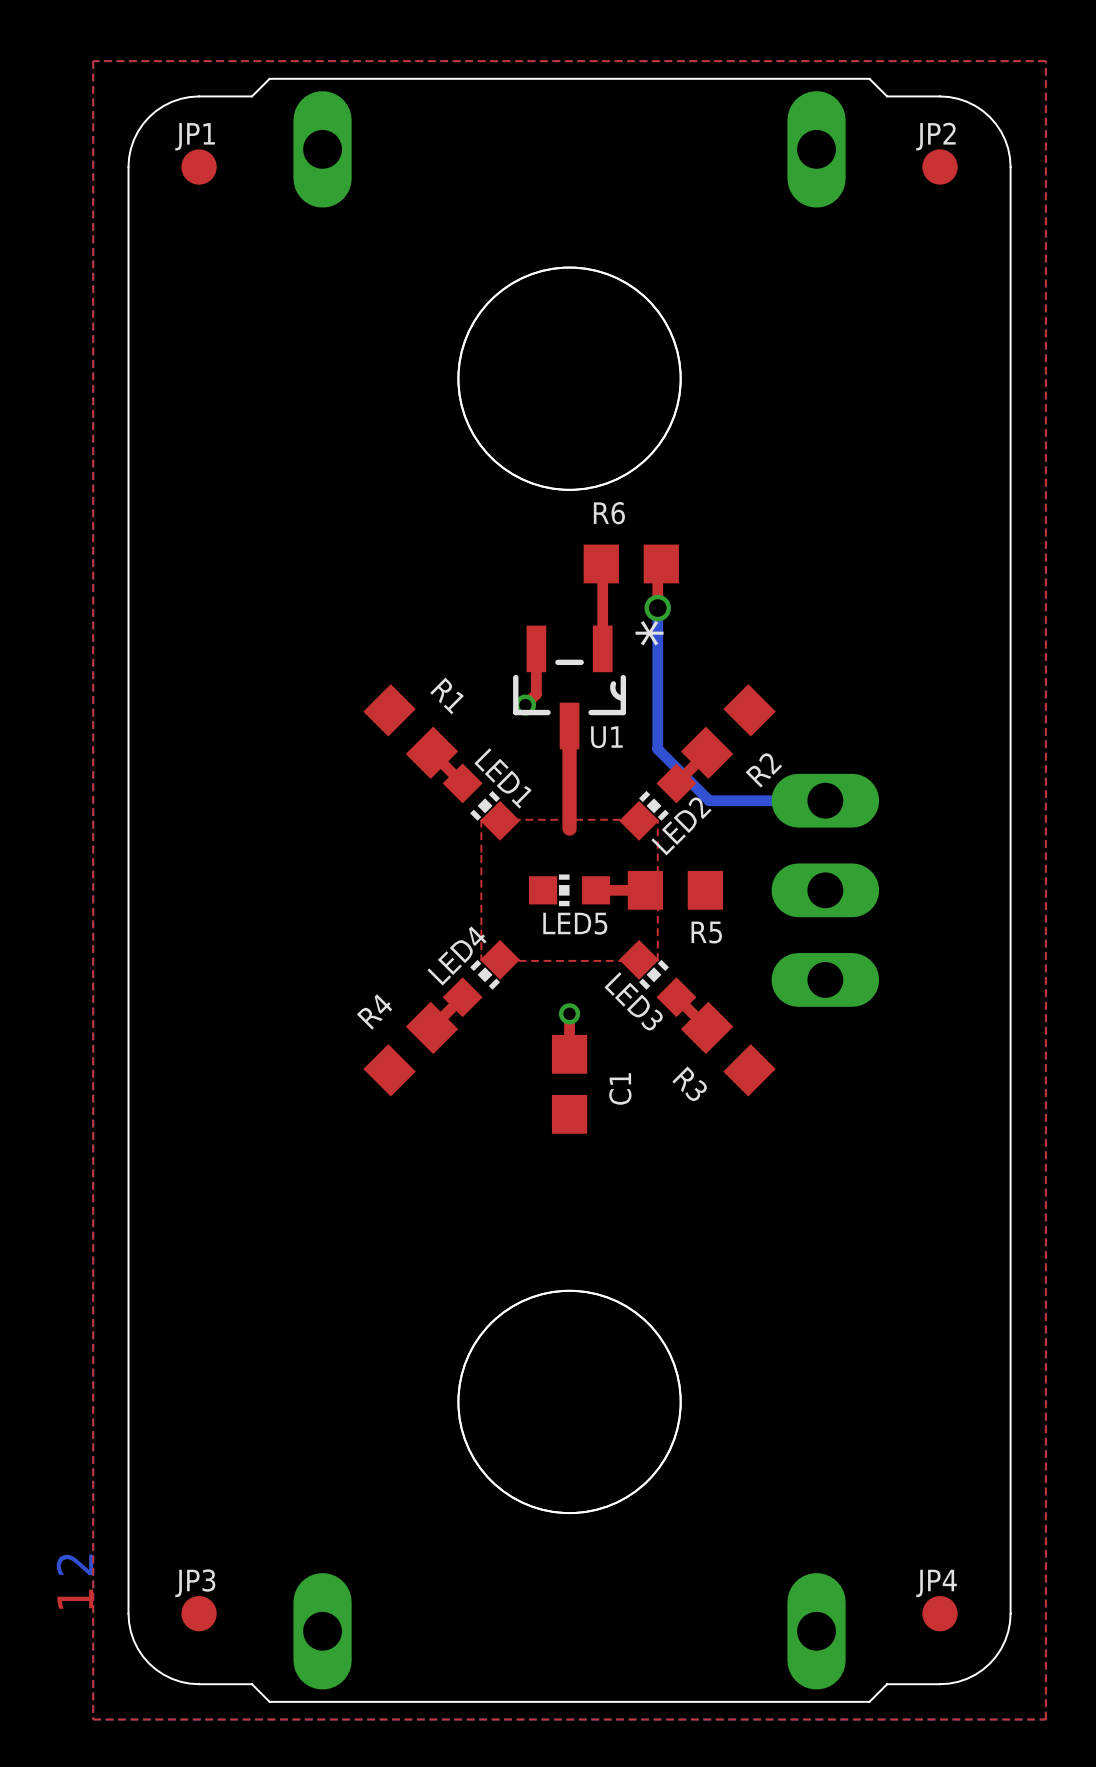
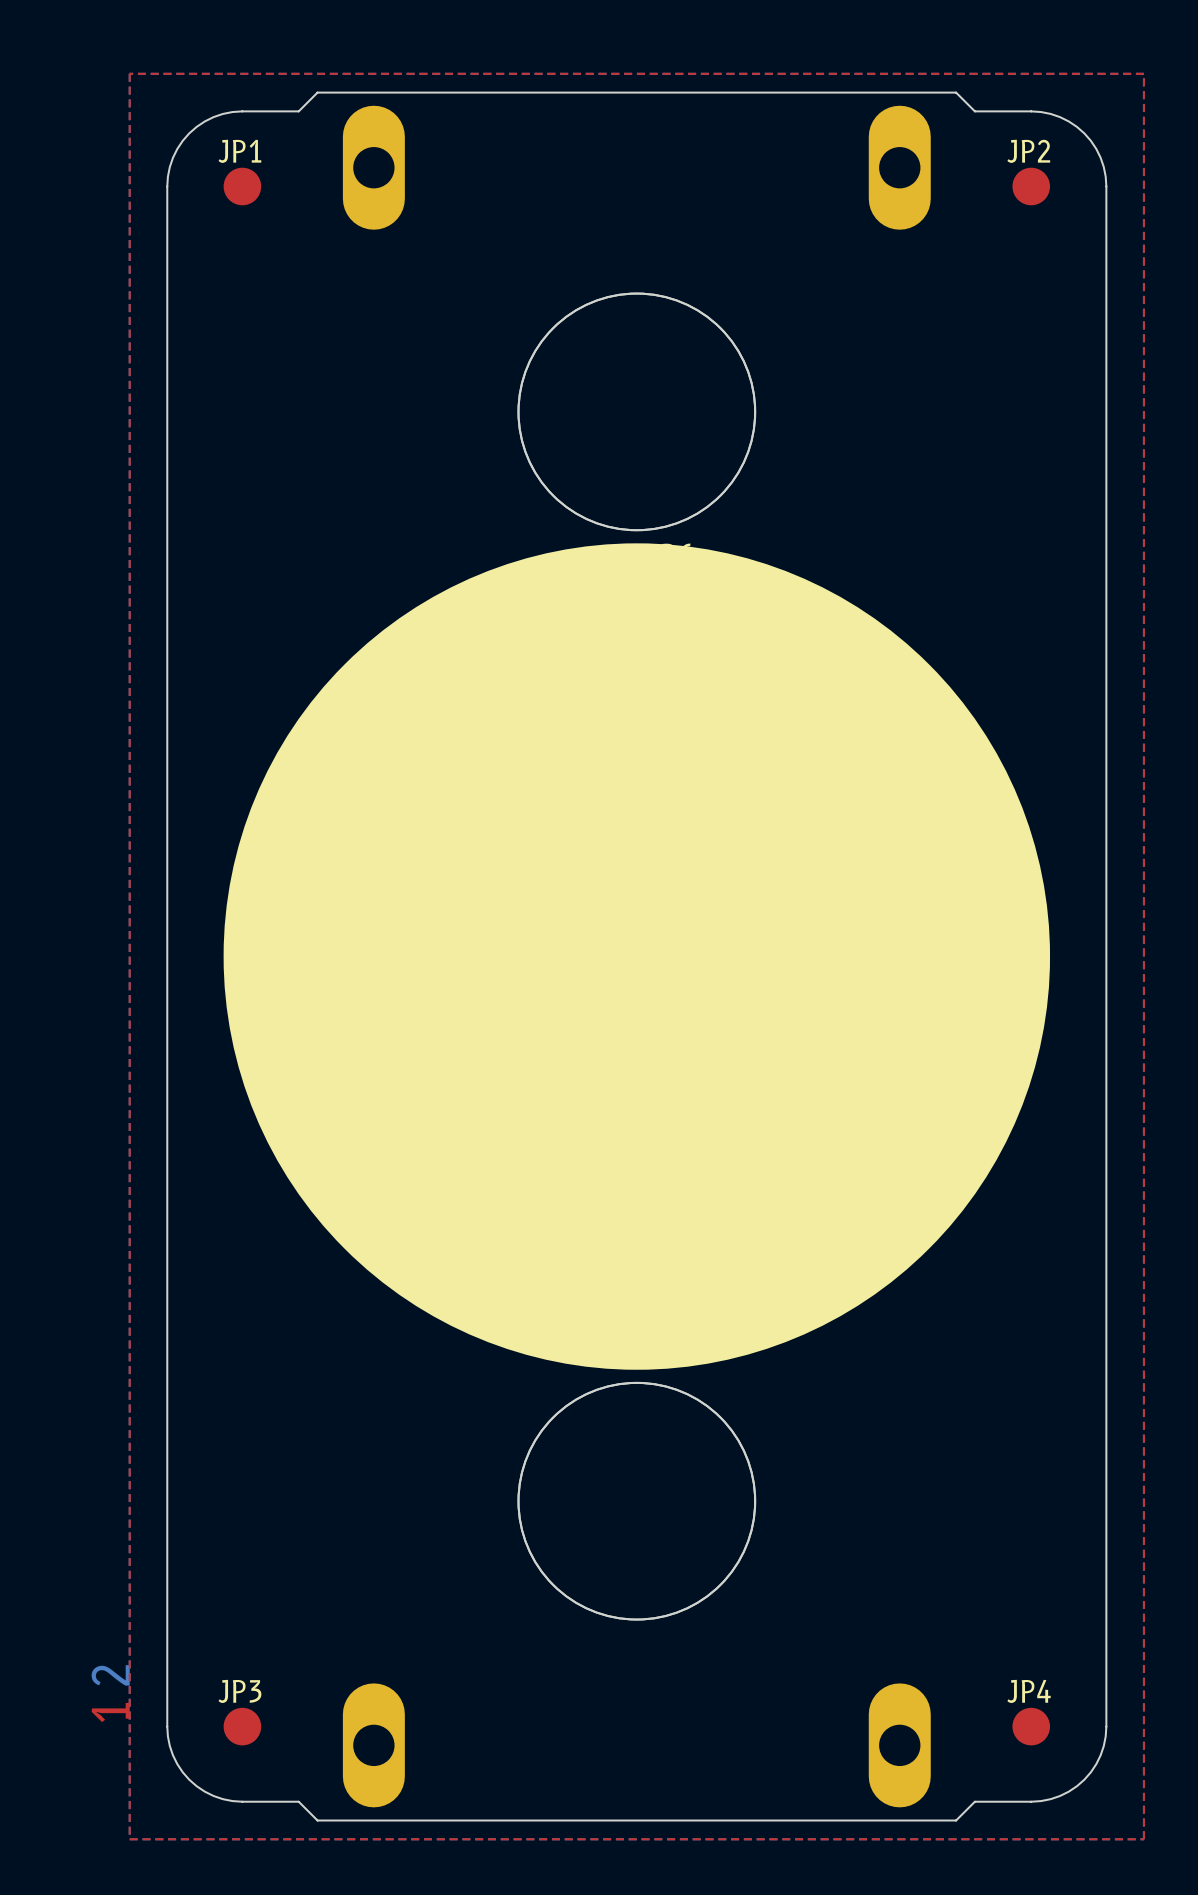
drawing: none -> [223, 543, 1051, 1370]

